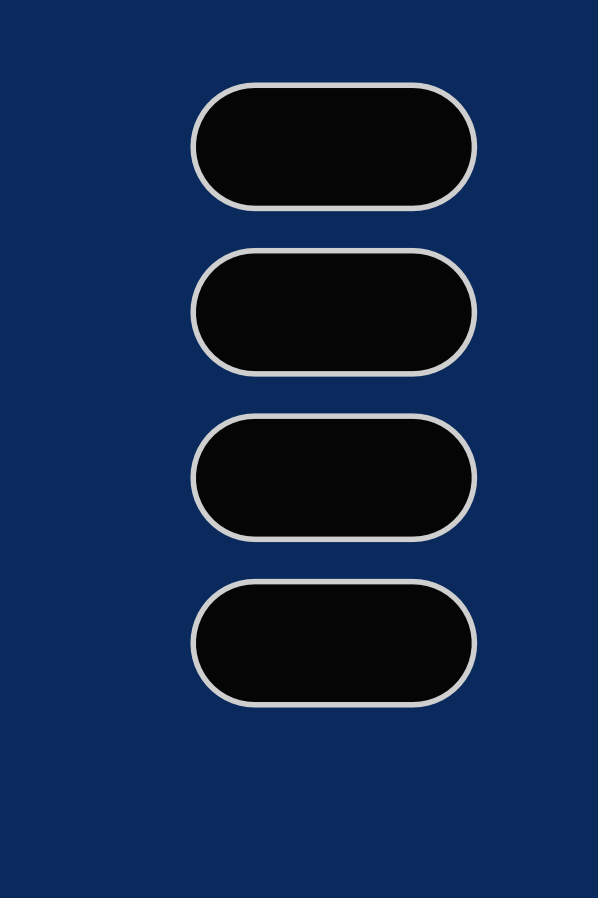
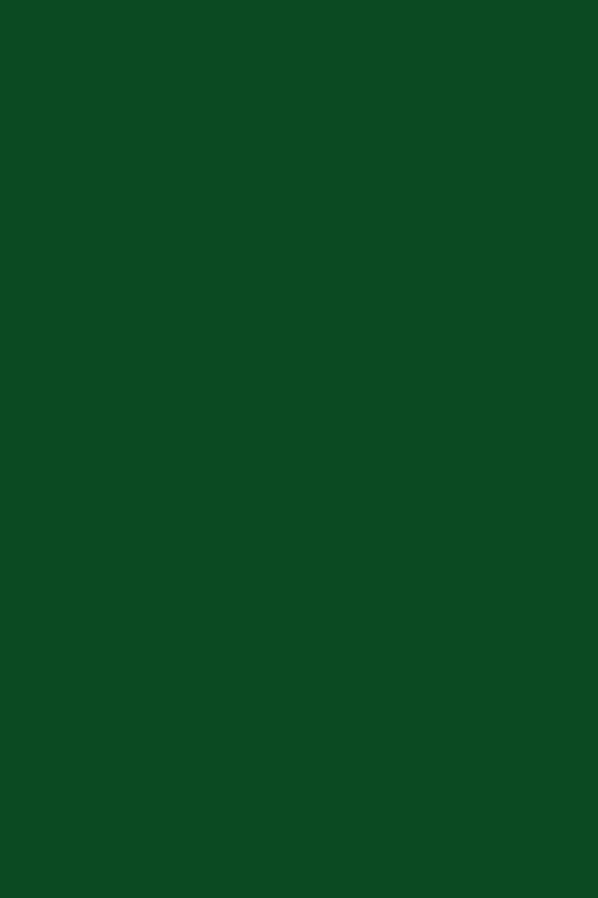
part: (333, 146) -> none
part: (333, 312) -> none
part: (333, 477) -> none
part: (333, 643) -> none

